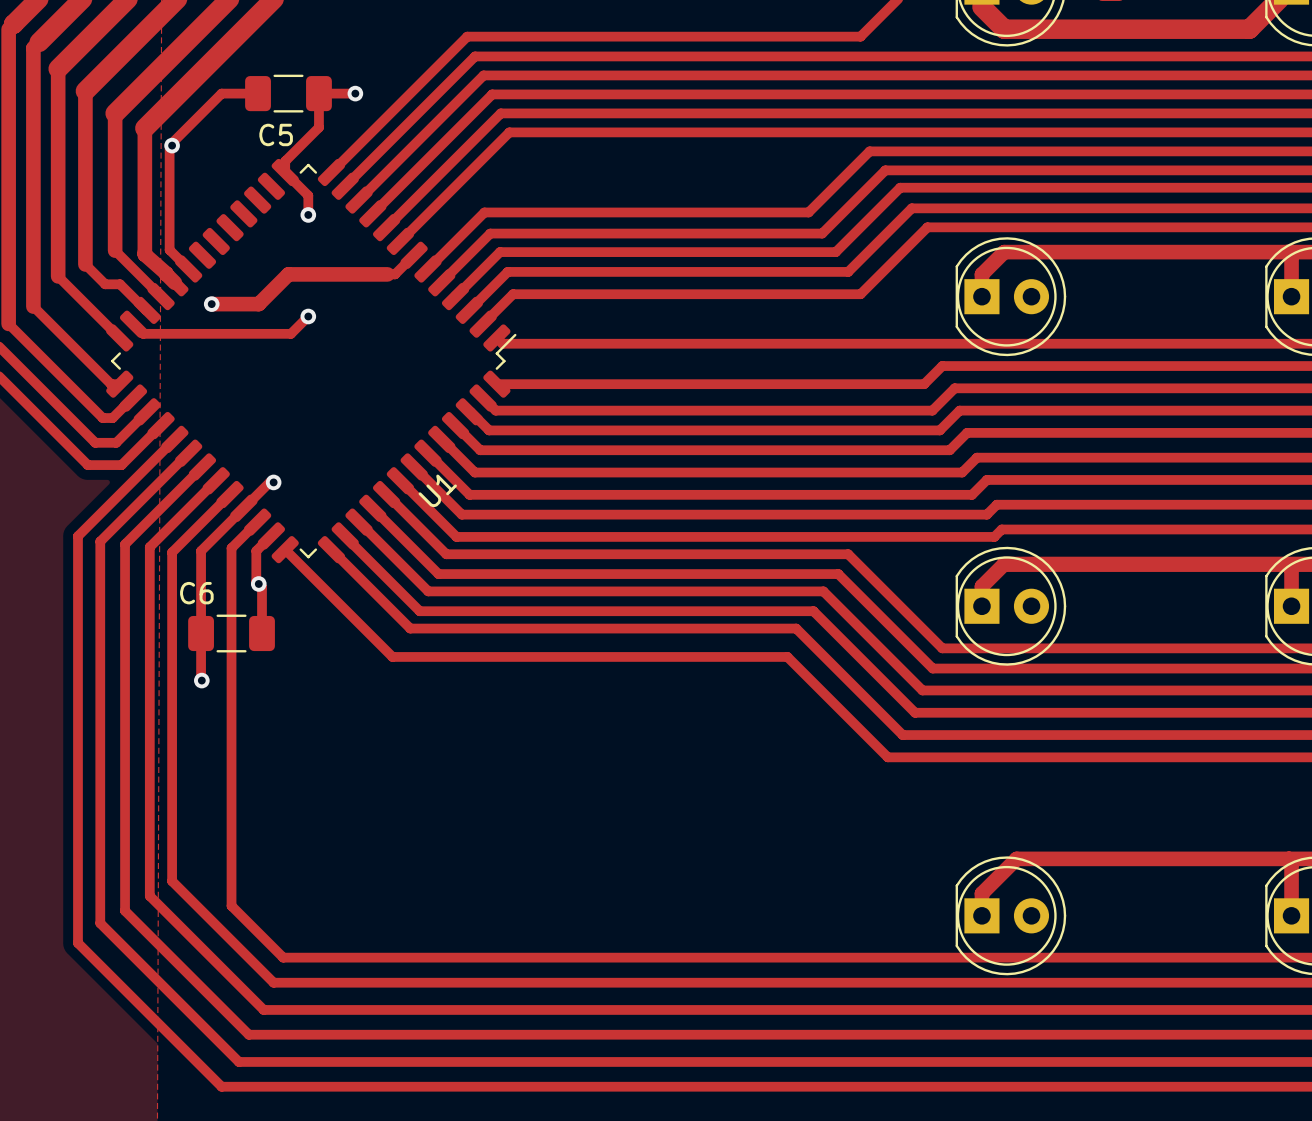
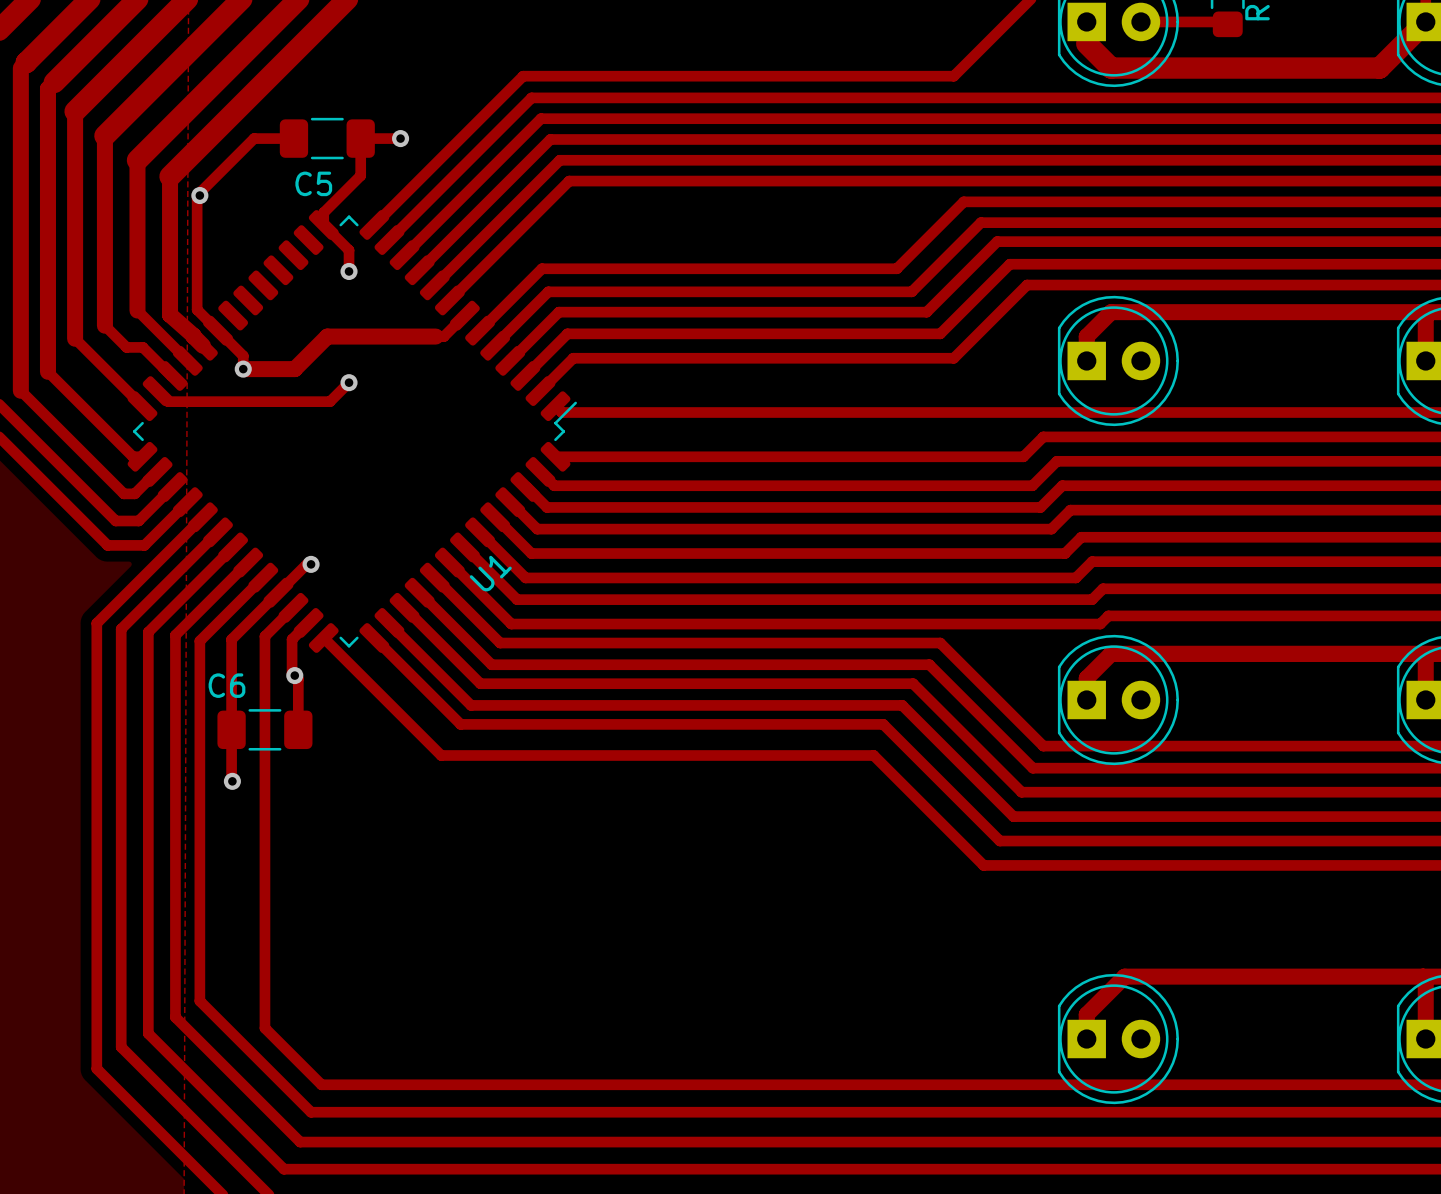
track: none -> (218, 330) (243, 355) (243, 369)

